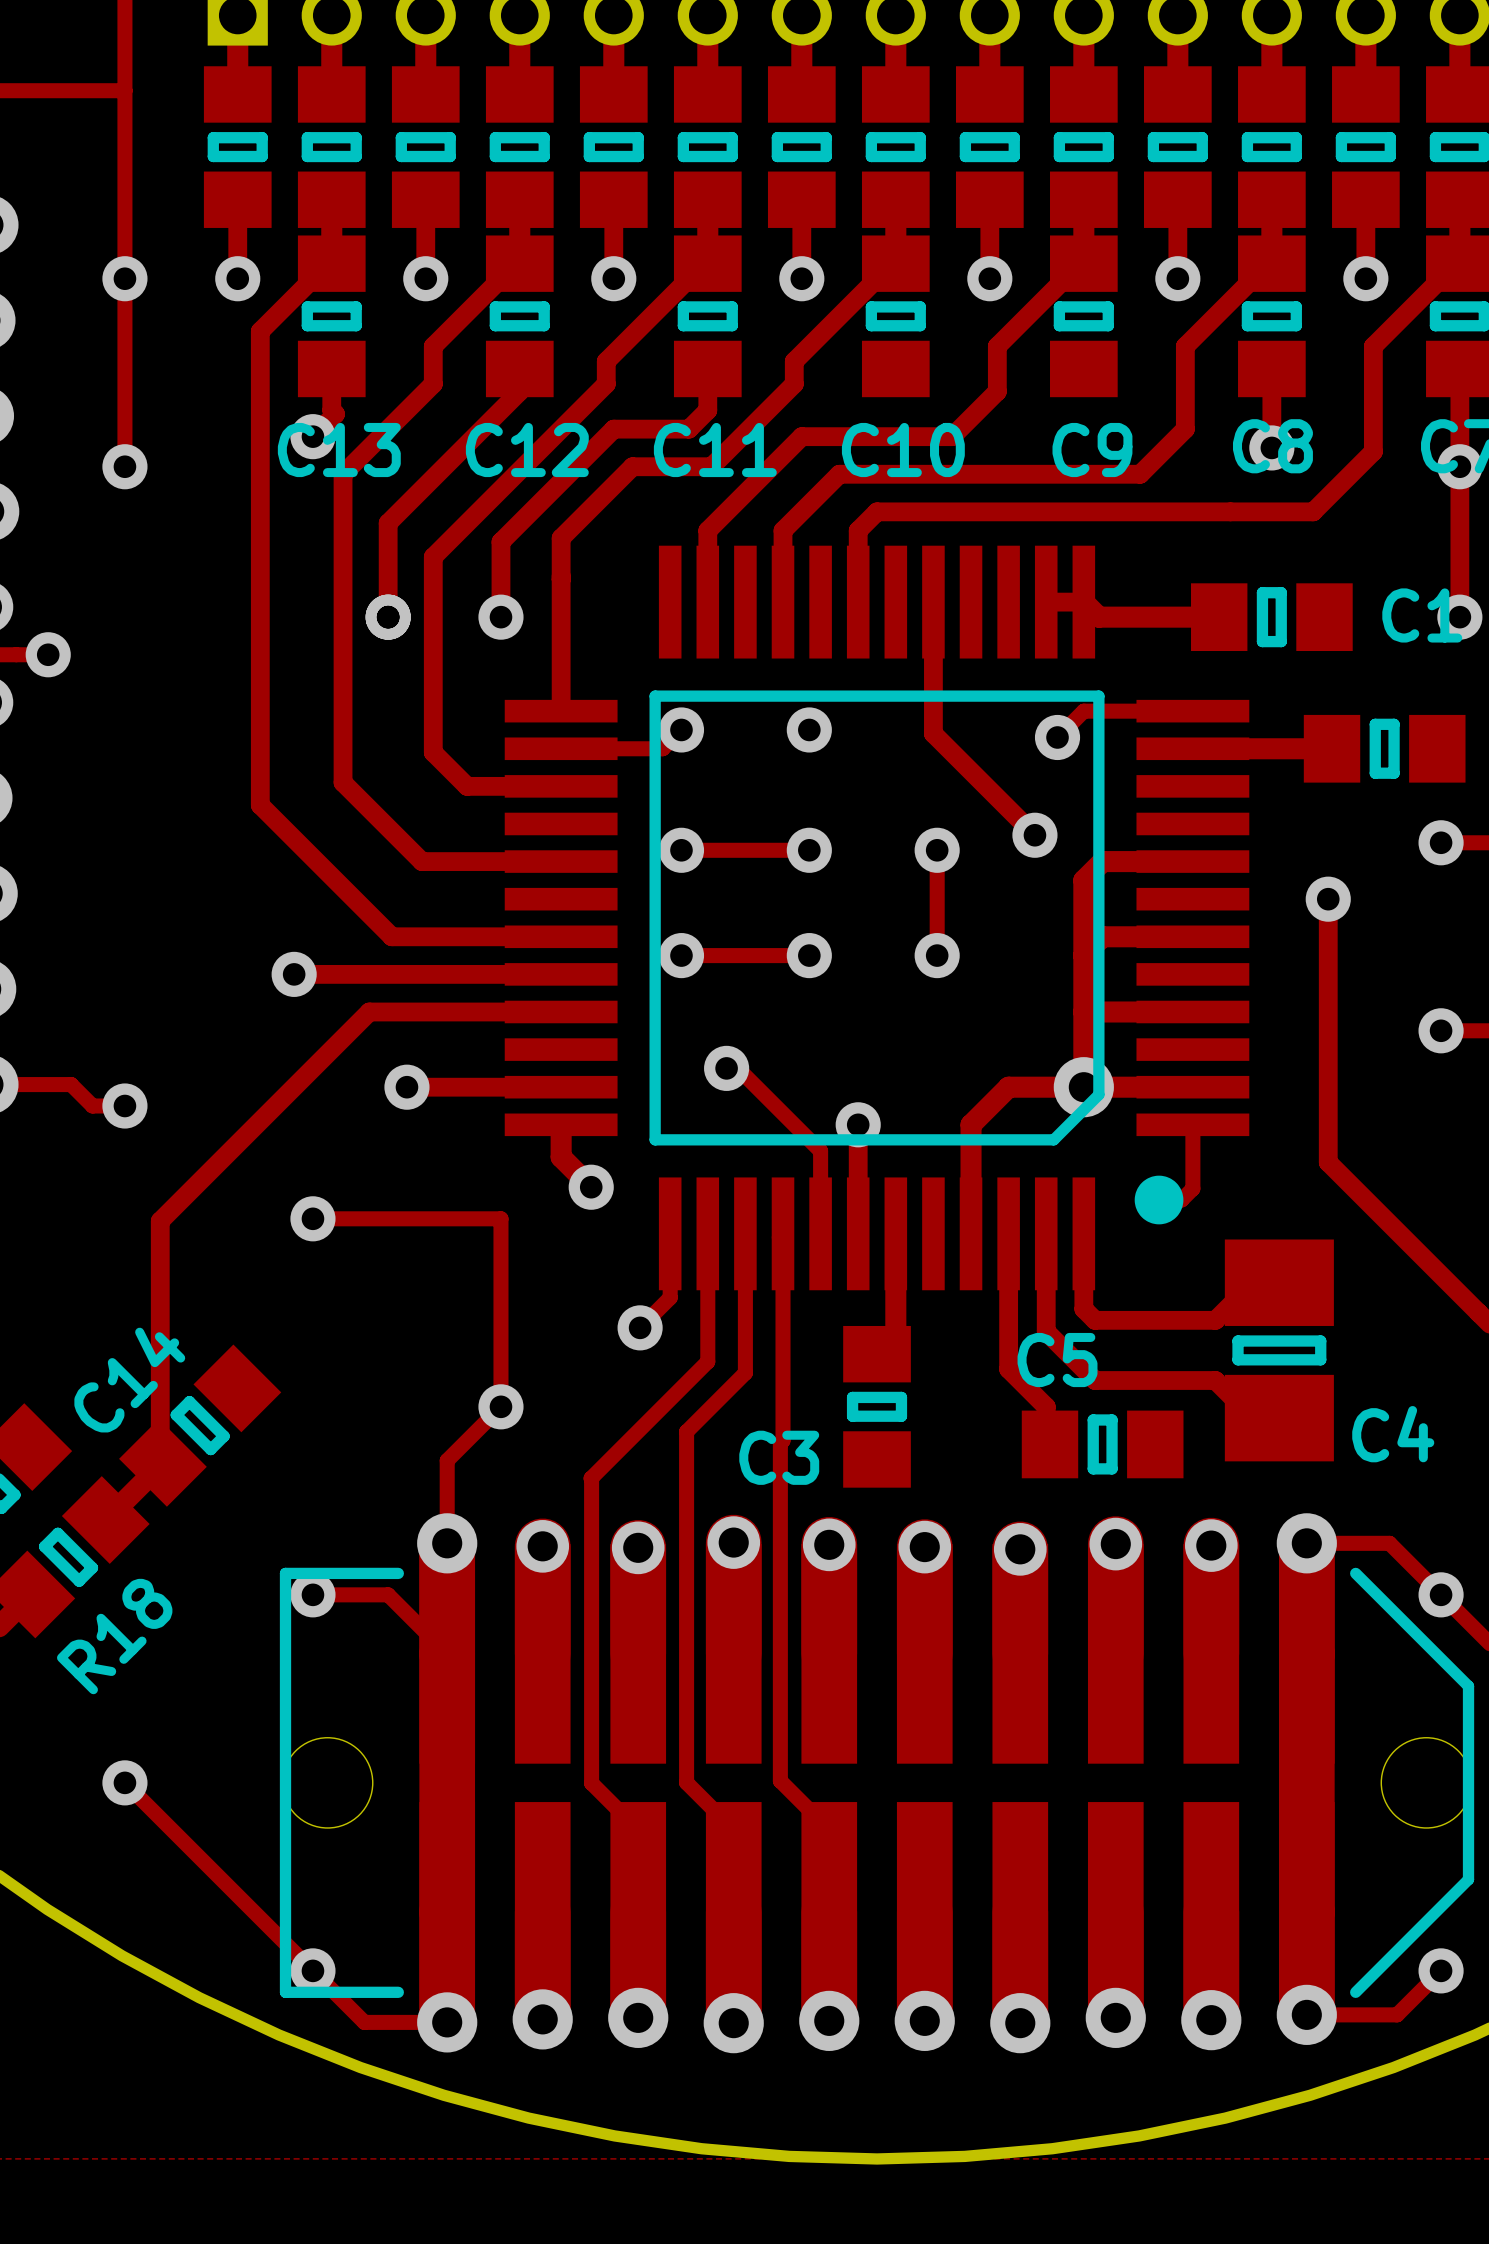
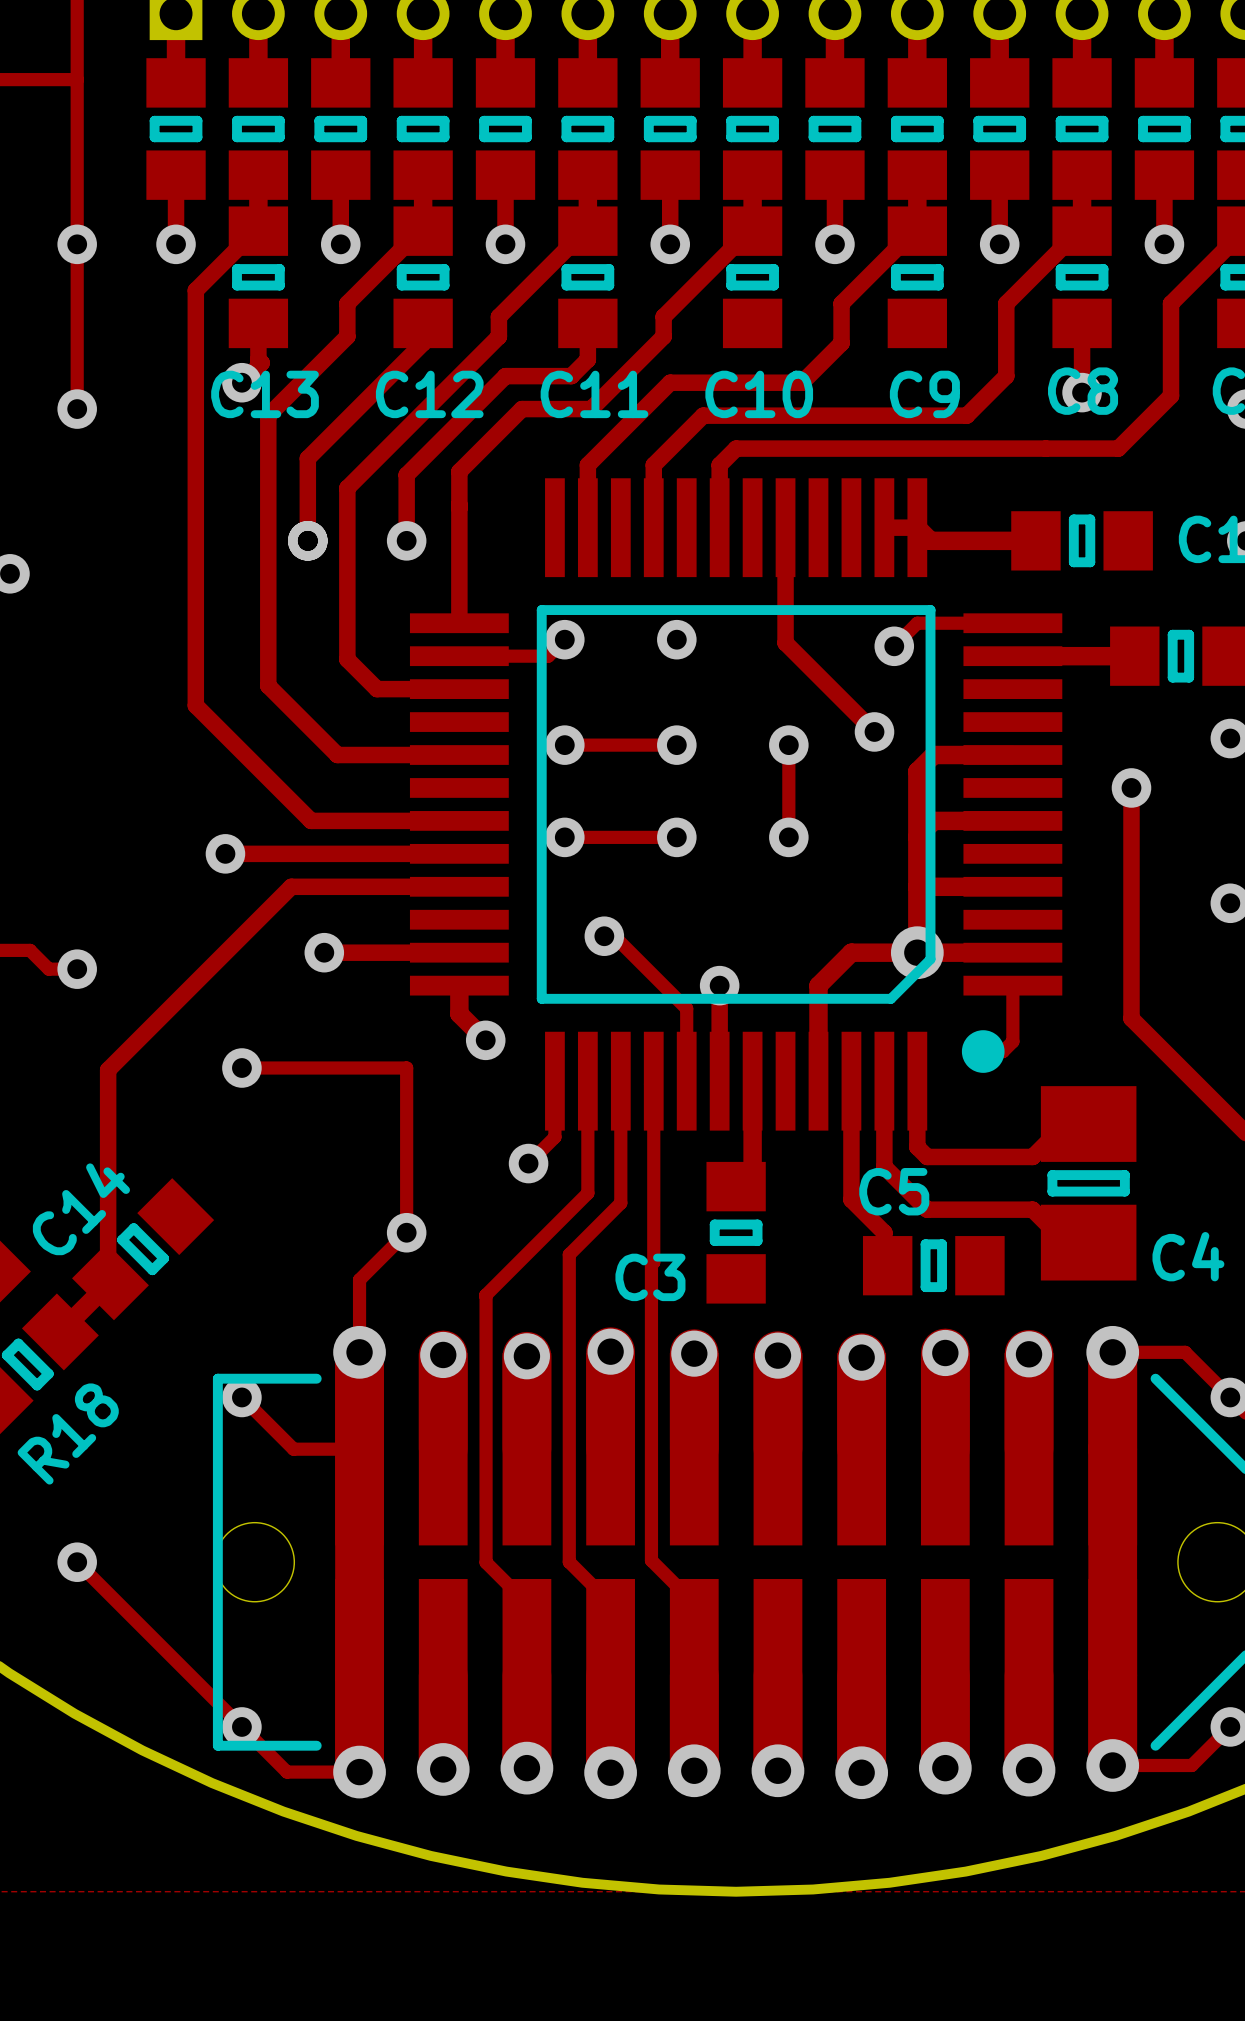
track: (312, 1594) (388, 1594) (447, 1653) -> (241, 1397) (293, 1449) (359, 1449)

